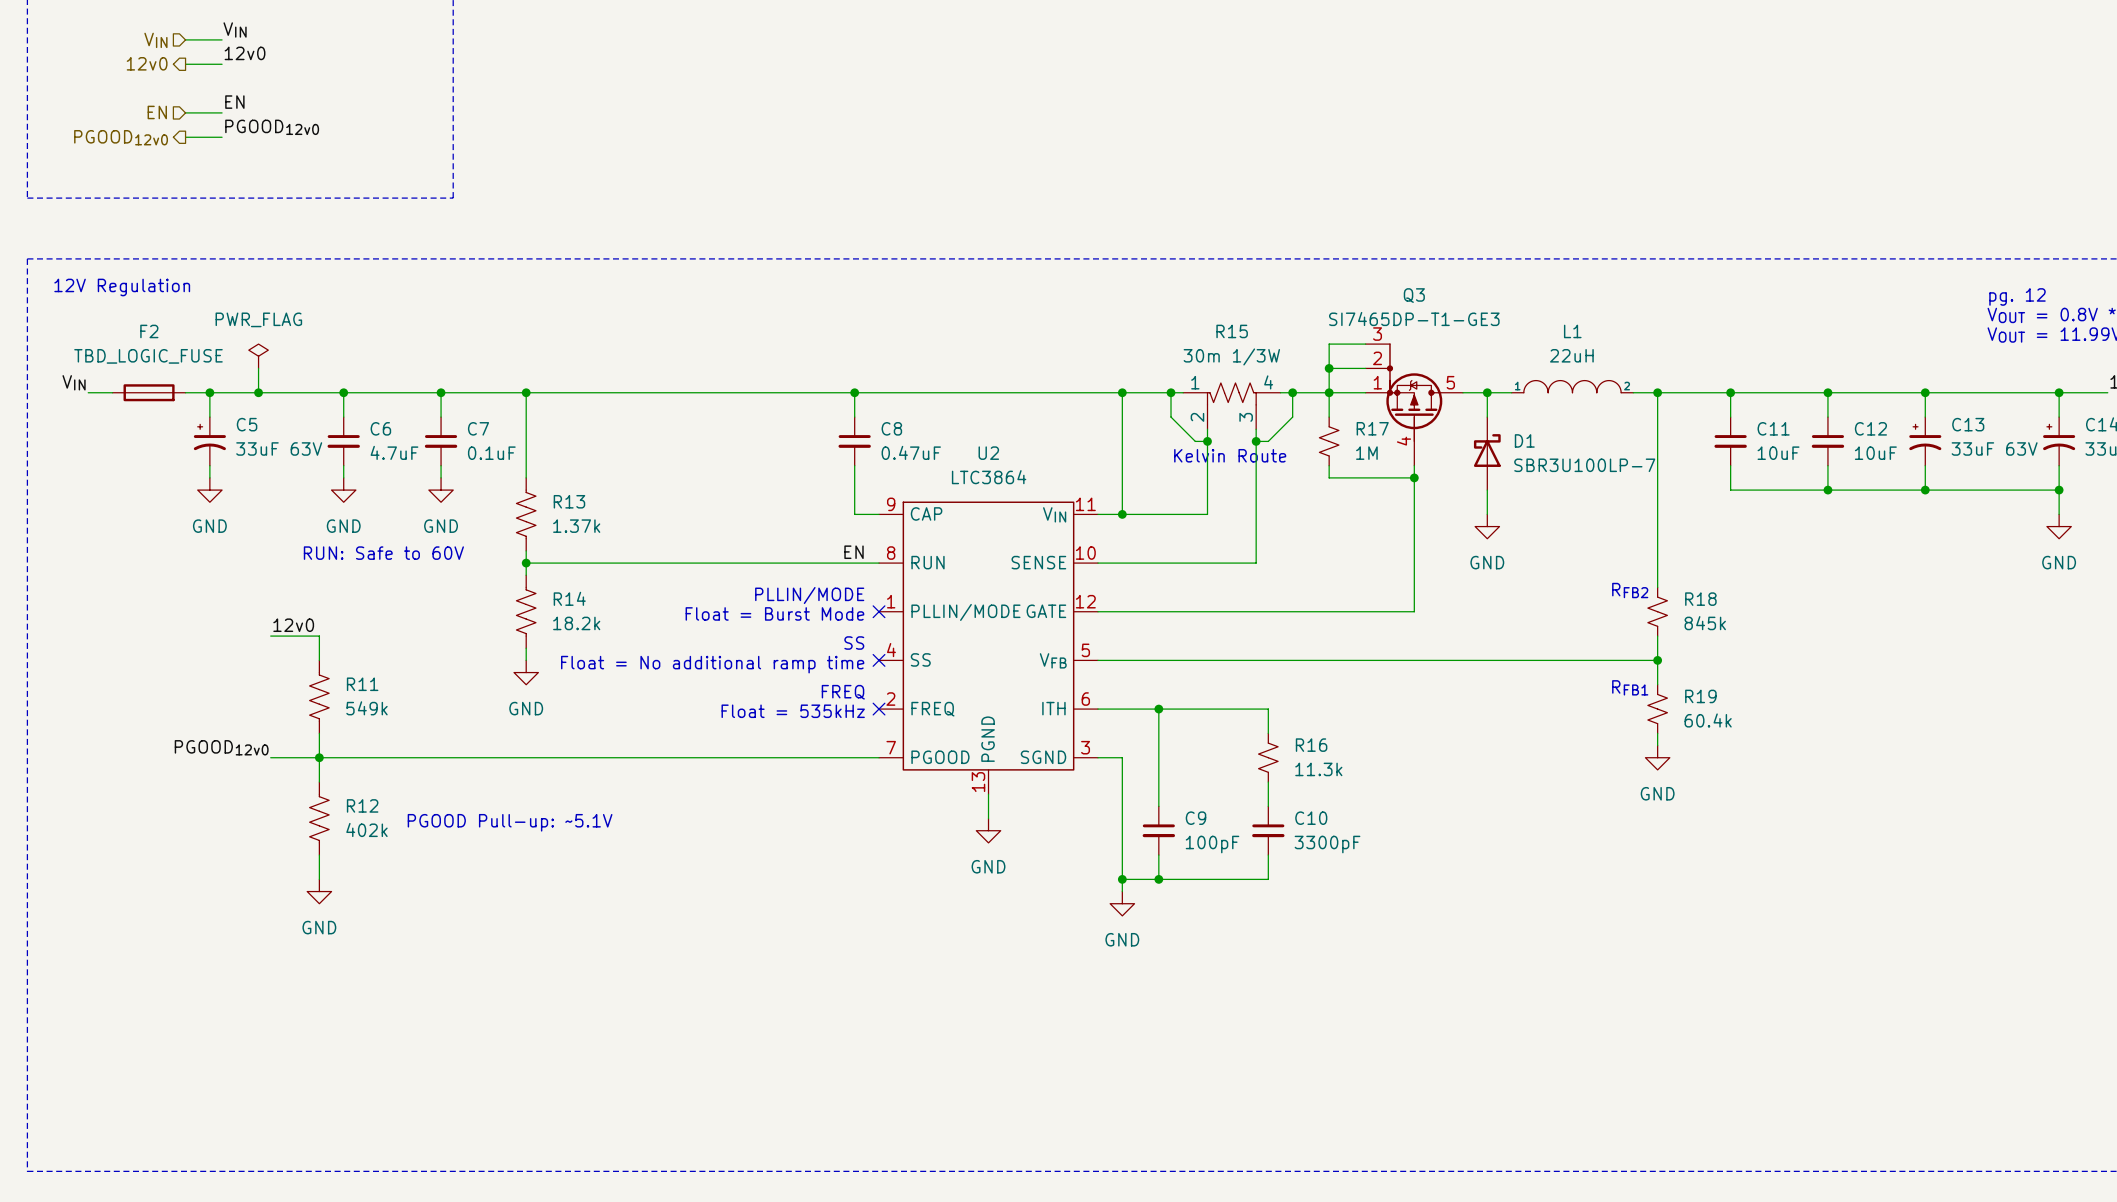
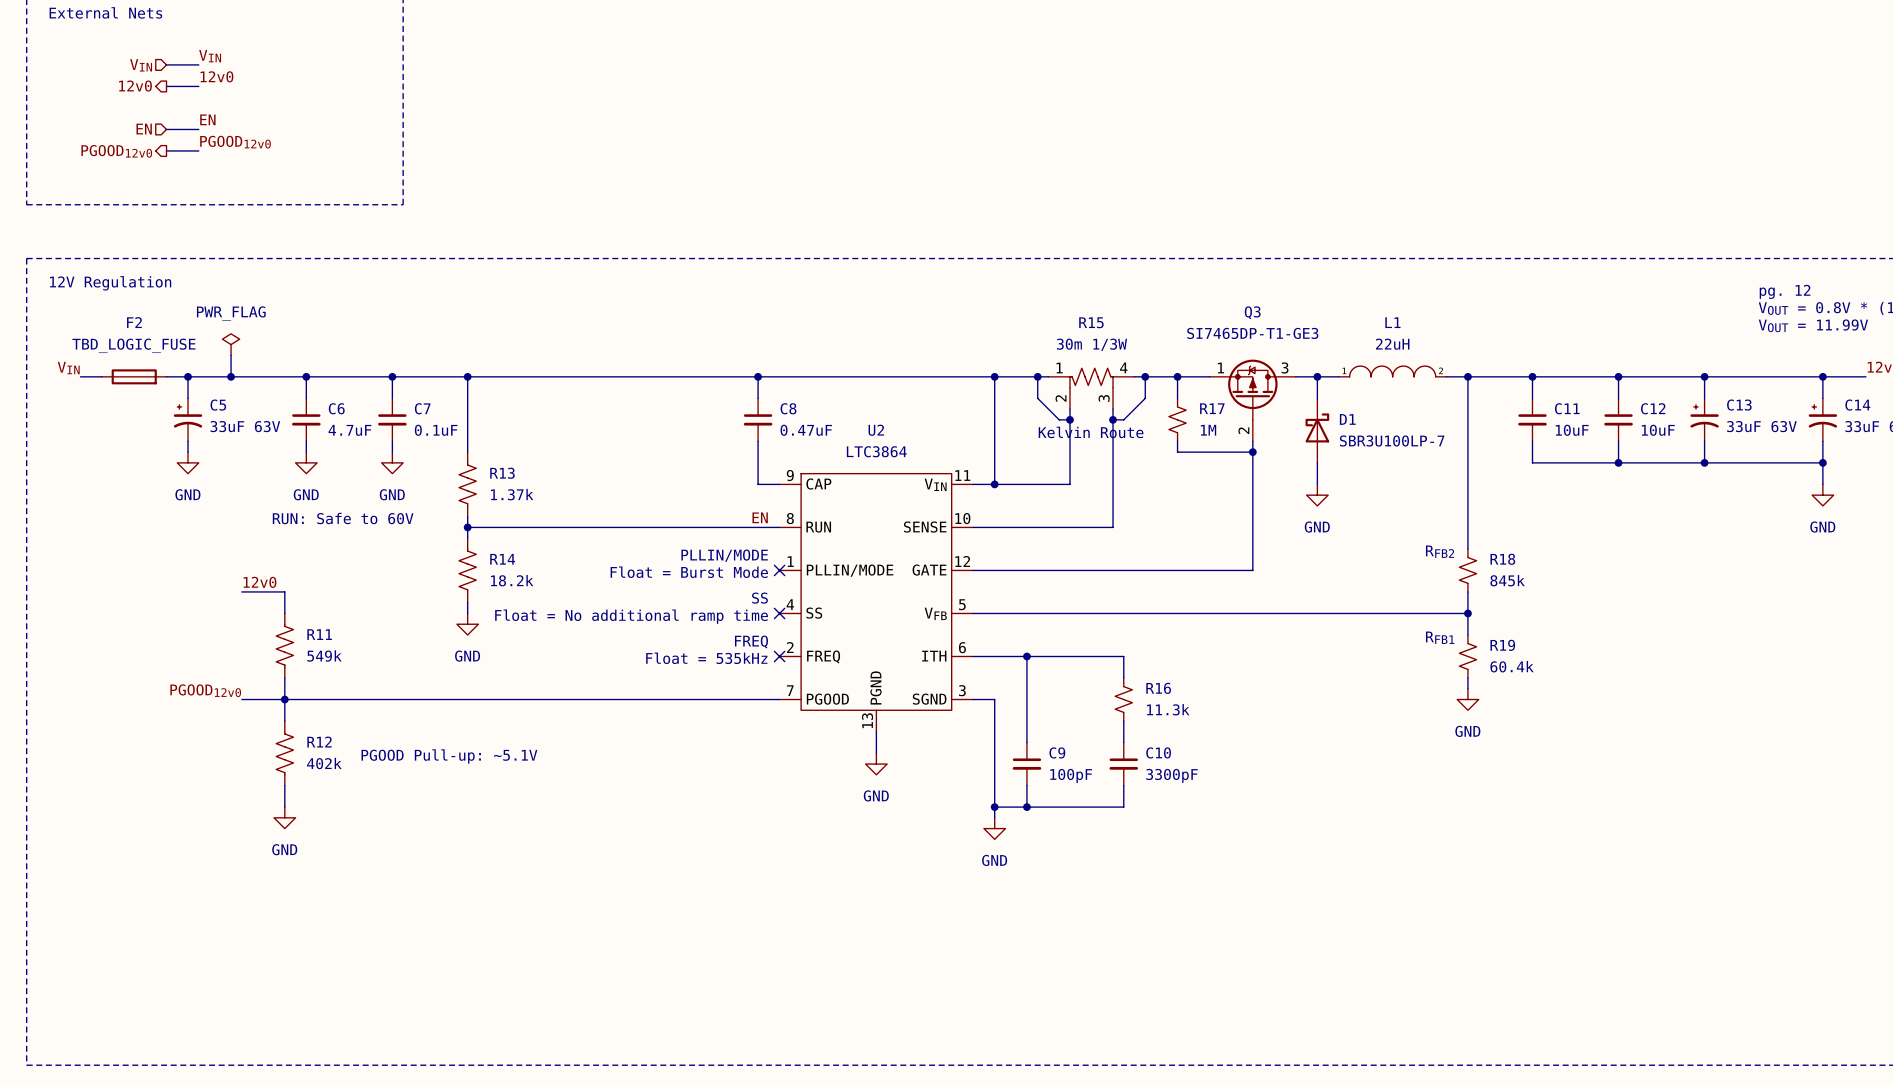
Q3 symbol: [1365, 343, 1463, 466] -> [1209, 359, 1296, 442]
wire: (1365, 344) (1329, 344) (1329, 392) -> none
wire: (1329, 368) (1365, 368) -> none
junction: (1329, 368) -> none

